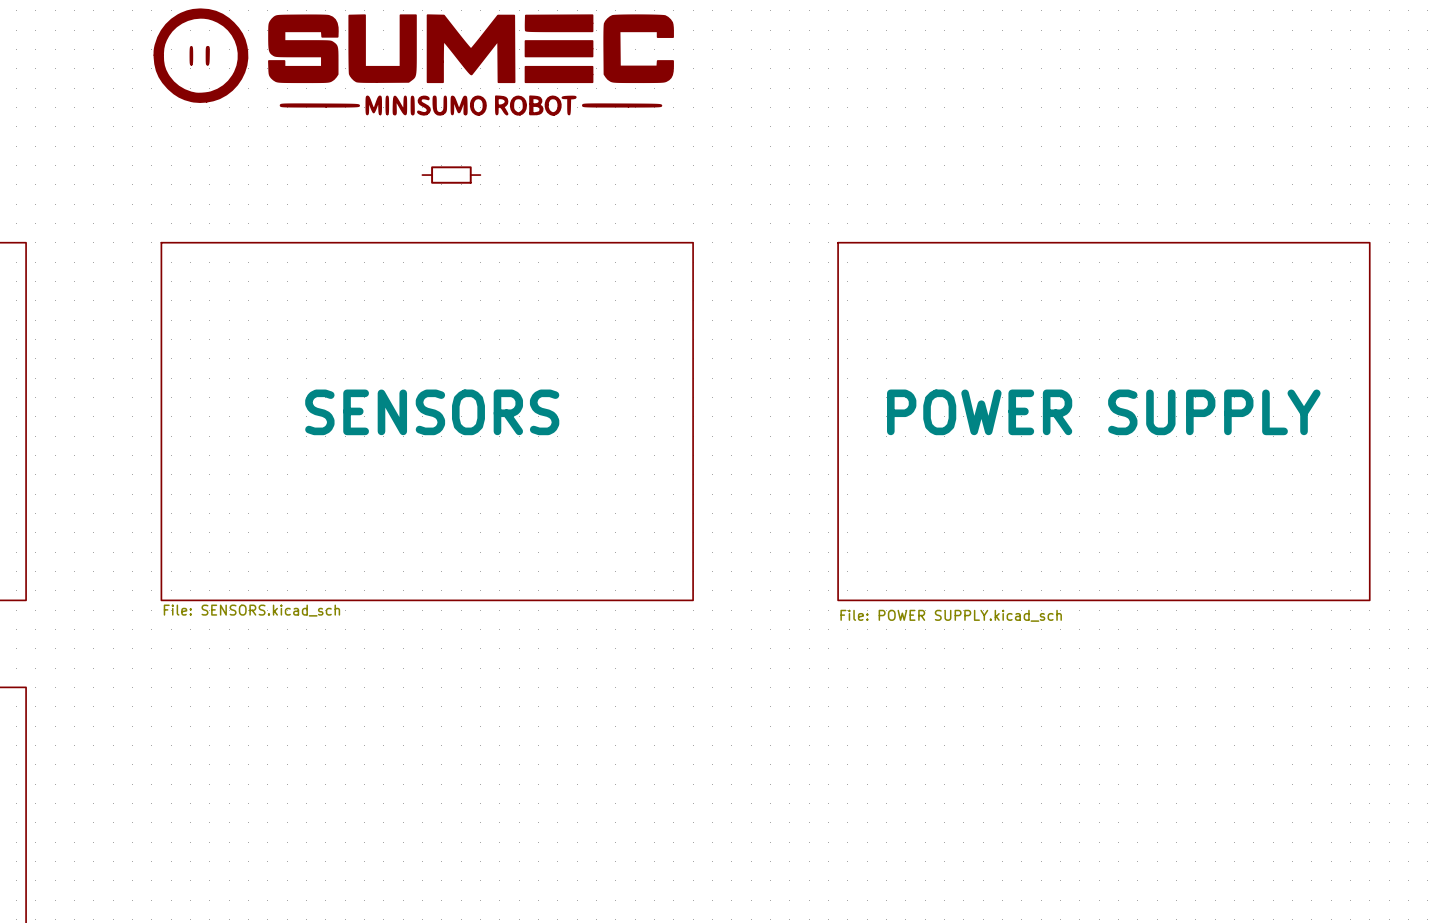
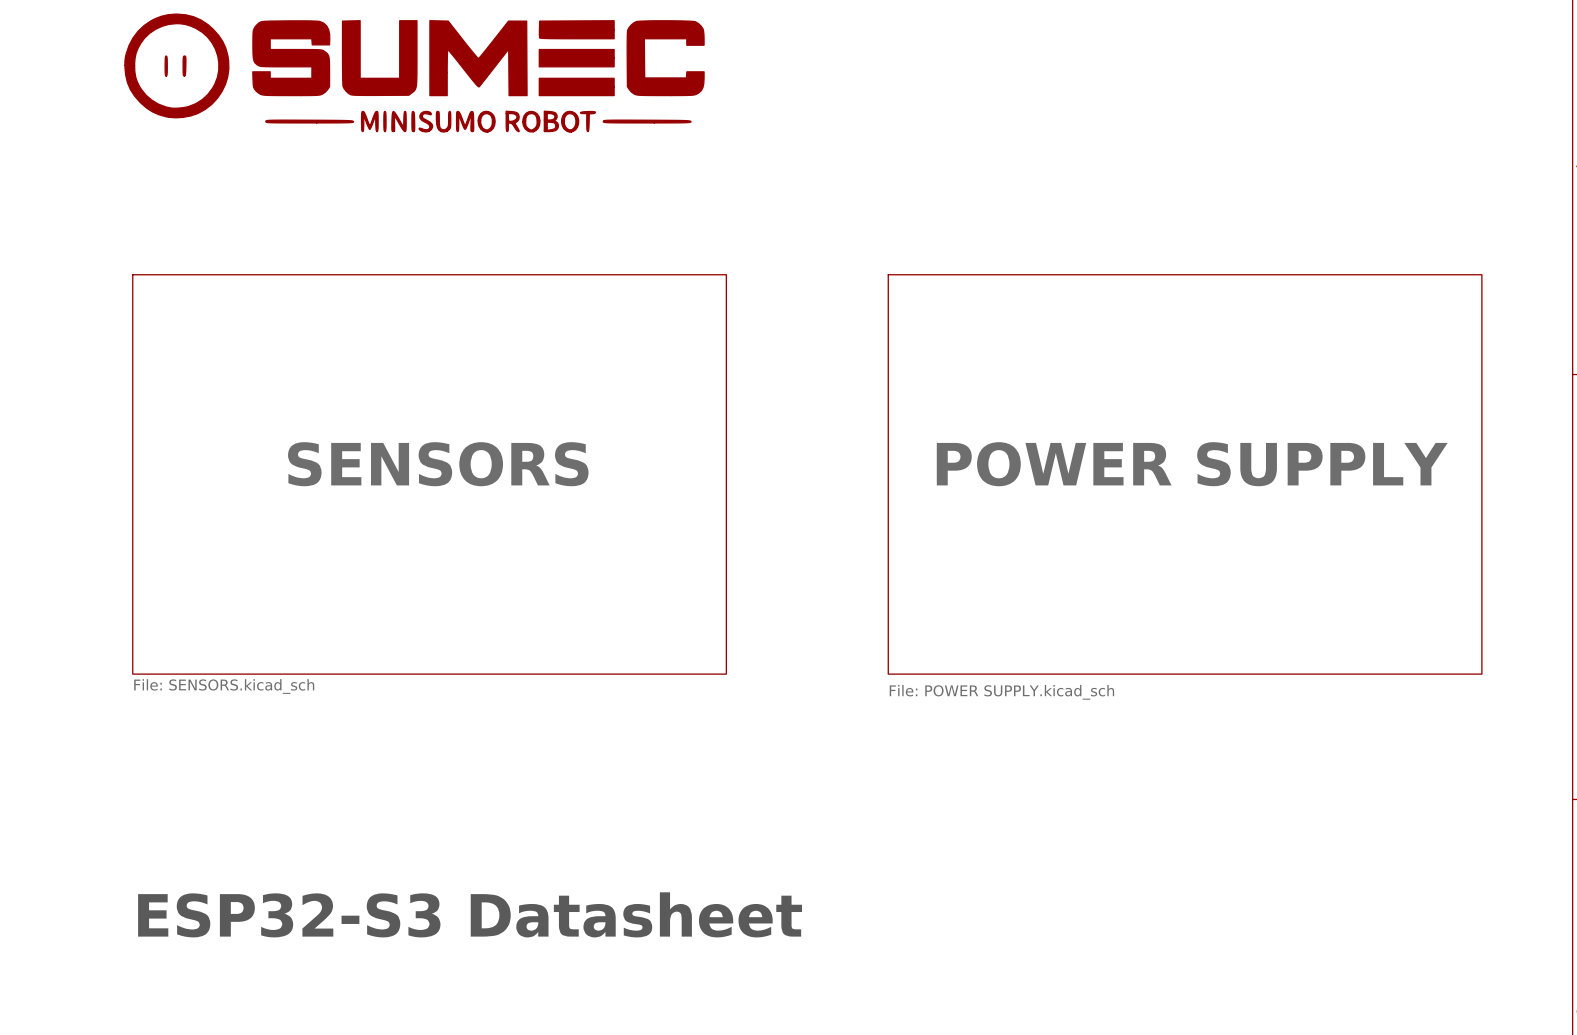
part: (451, 175) -> none
text: none -> ESP32-S3 Datasheet (470, 914)

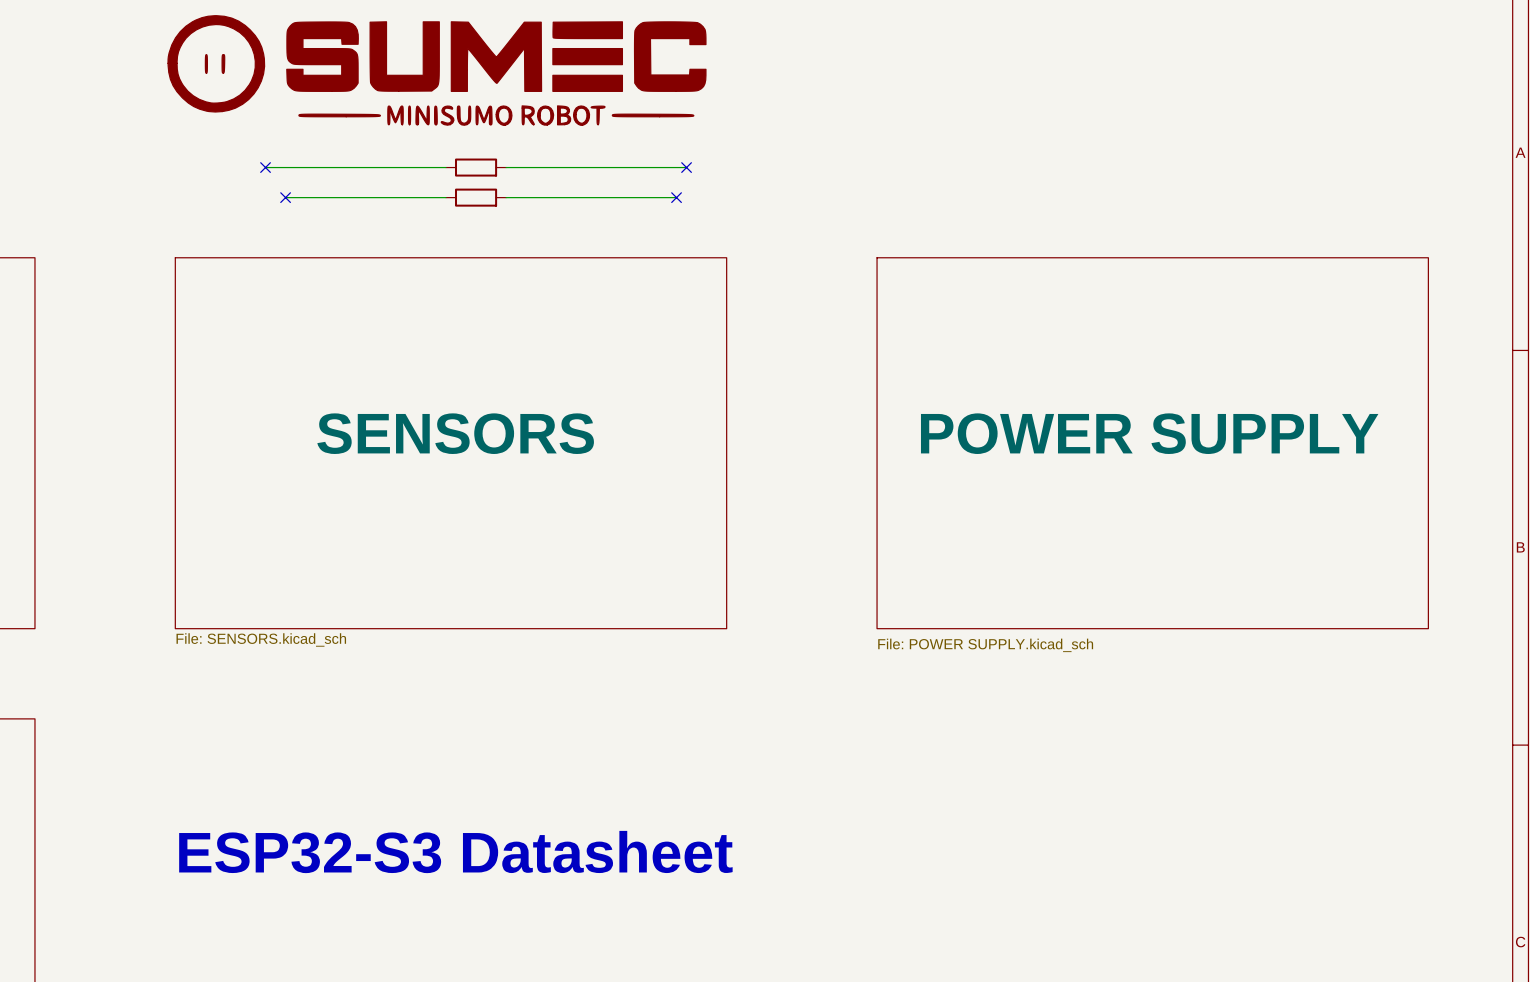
wire: none -> (265, 167) (445, 167)
no-connect mark: none -> (265, 167)
part: none -> (476, 167)
wire: none -> (506, 167) (686, 167)
no-connect mark: none -> (686, 167)
wire: none -> (285, 197) (445, 197)
no-connect mark: none -> (285, 197)
part: none -> (476, 197)
wire: none -> (506, 197) (676, 197)
no-connect mark: none -> (676, 197)

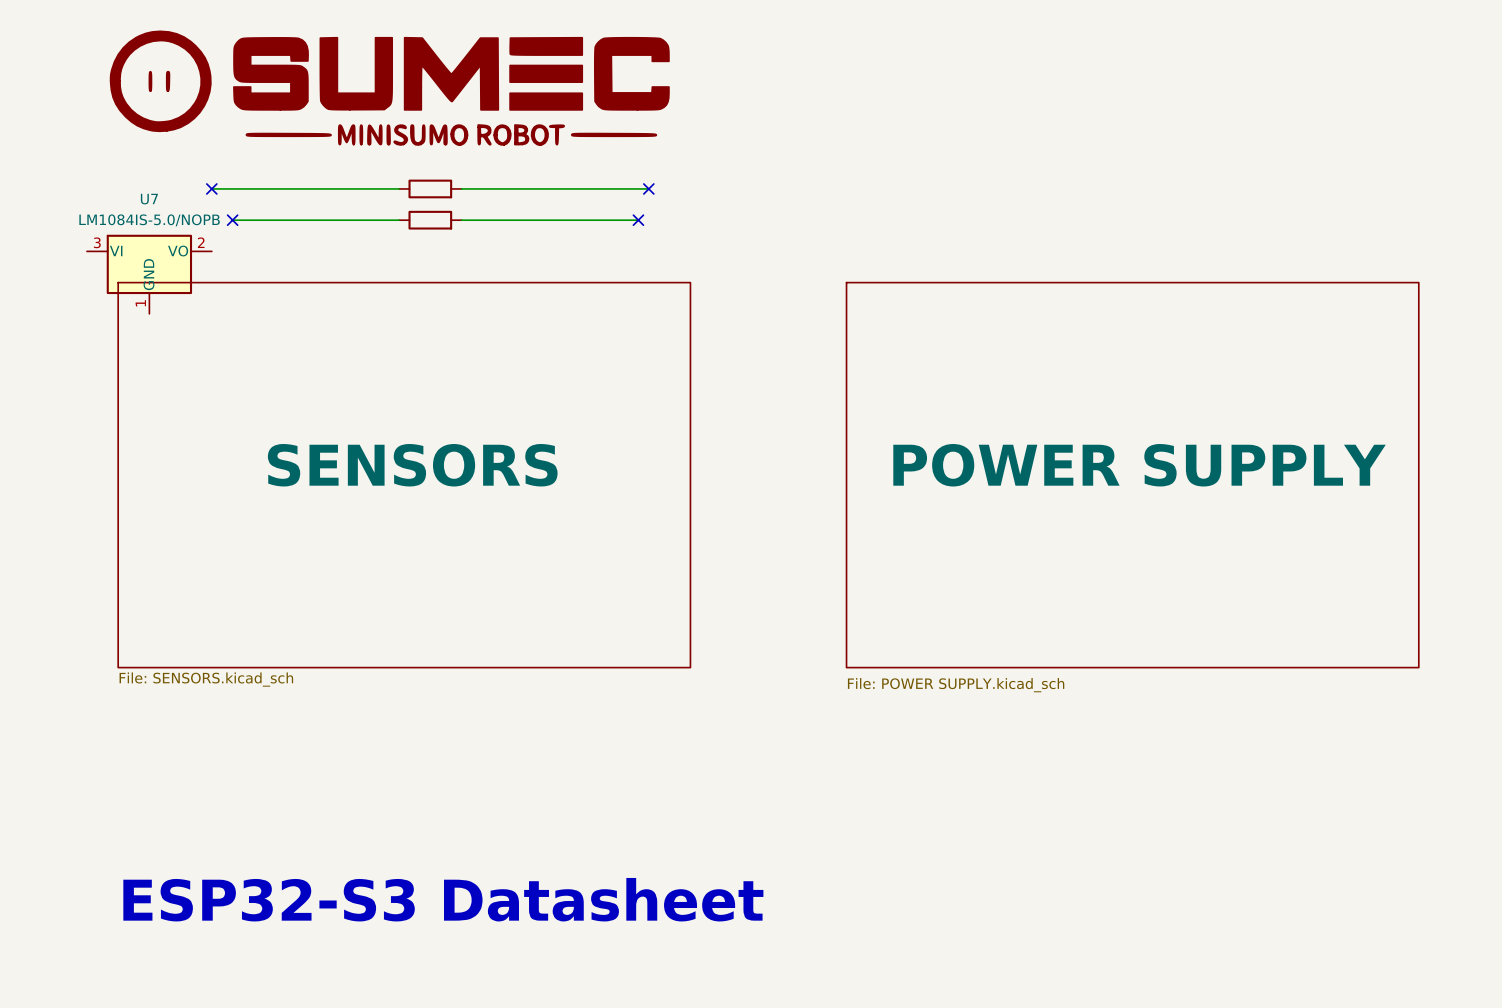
U7: none -> LM1084IS-5.0/NOPB (149, 274)

